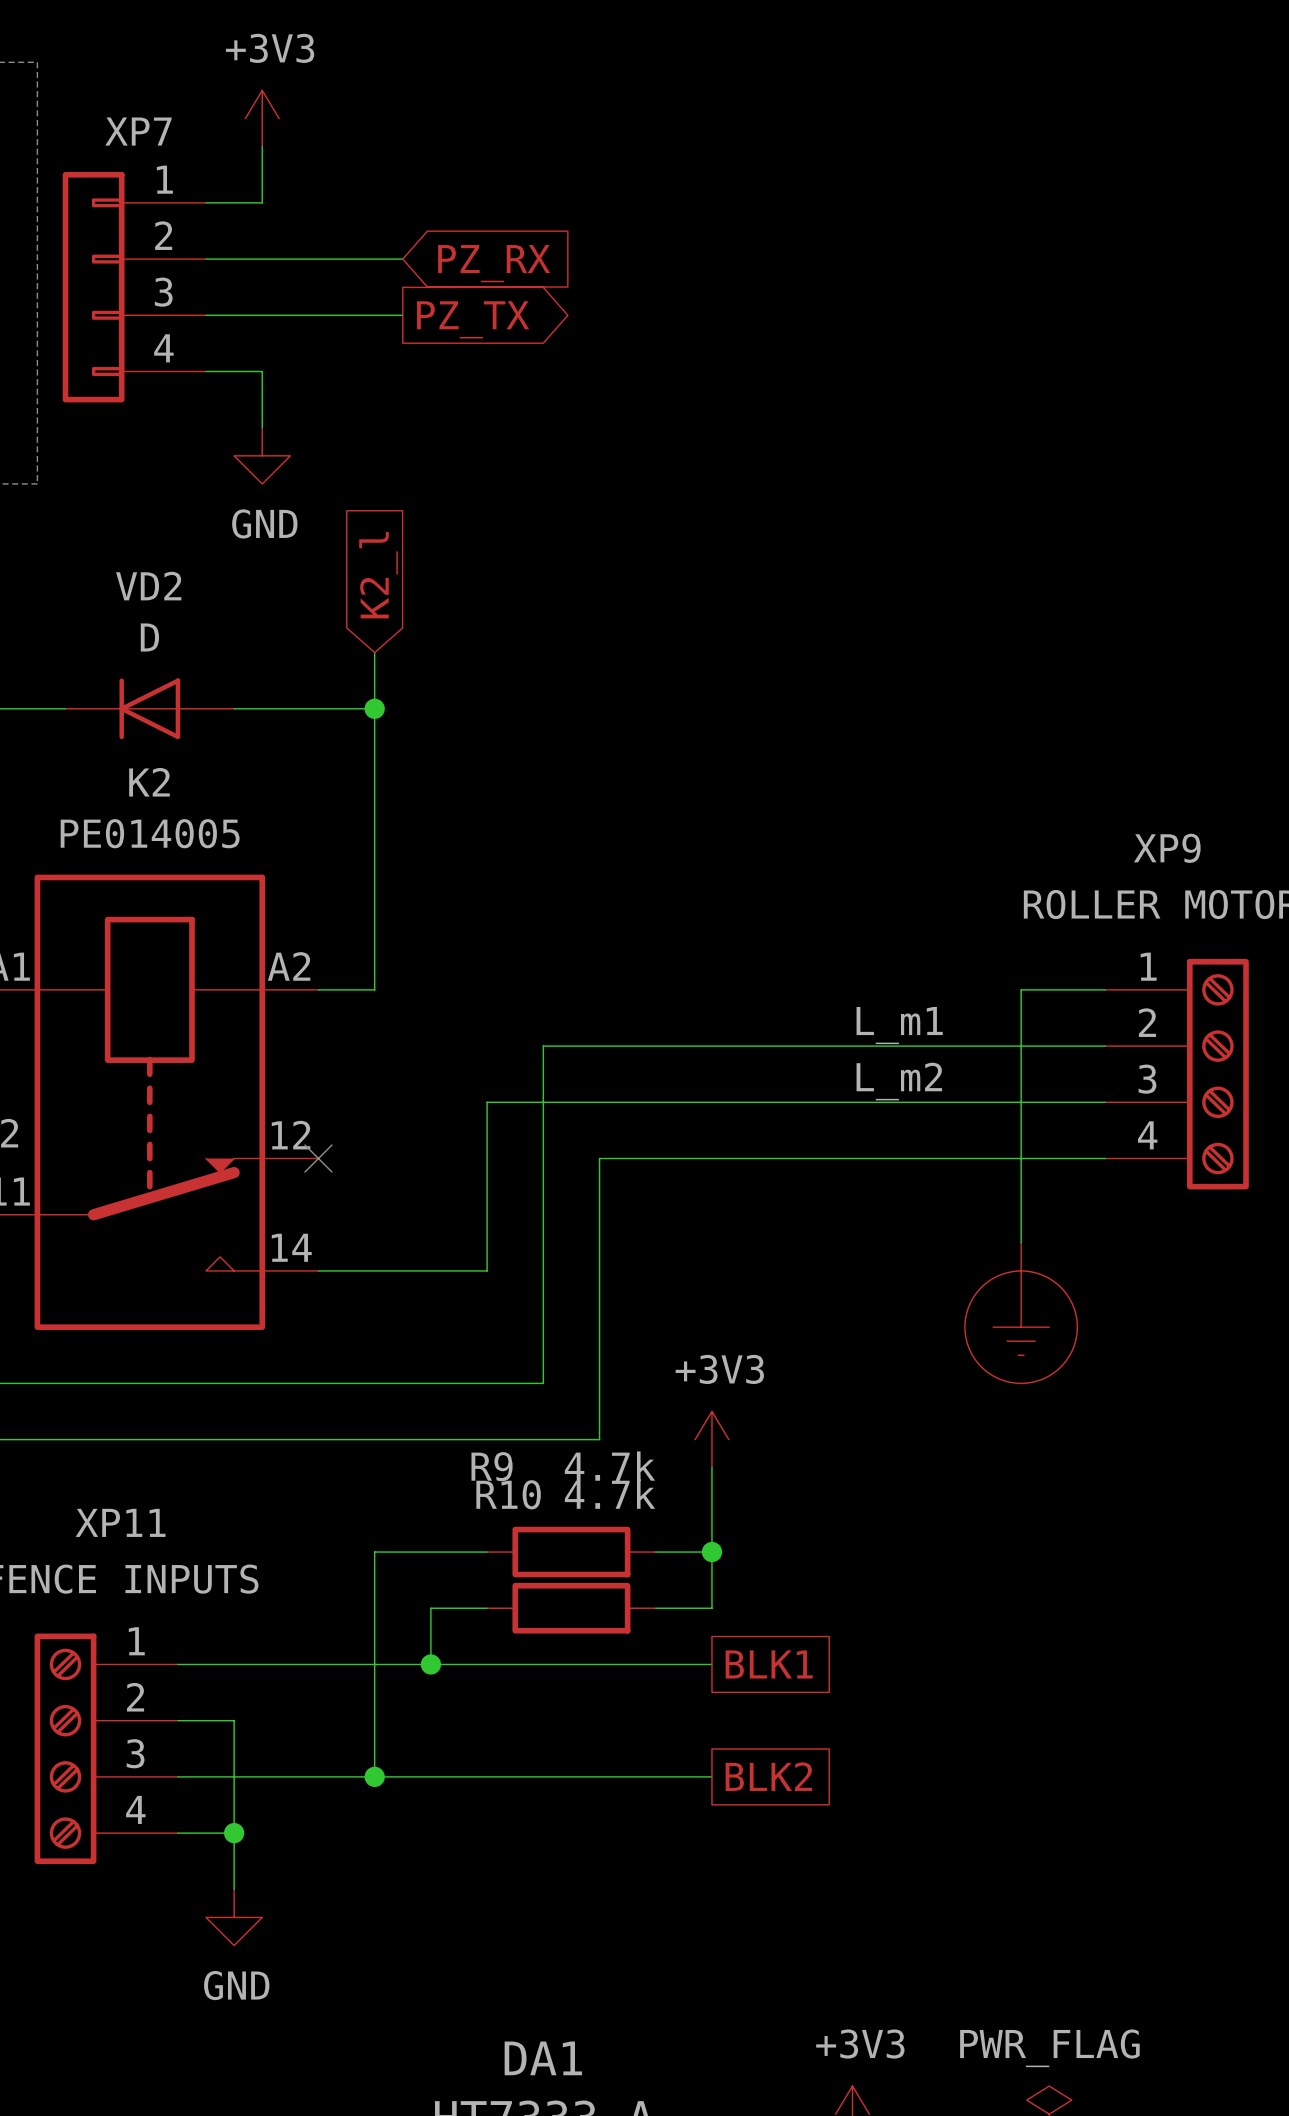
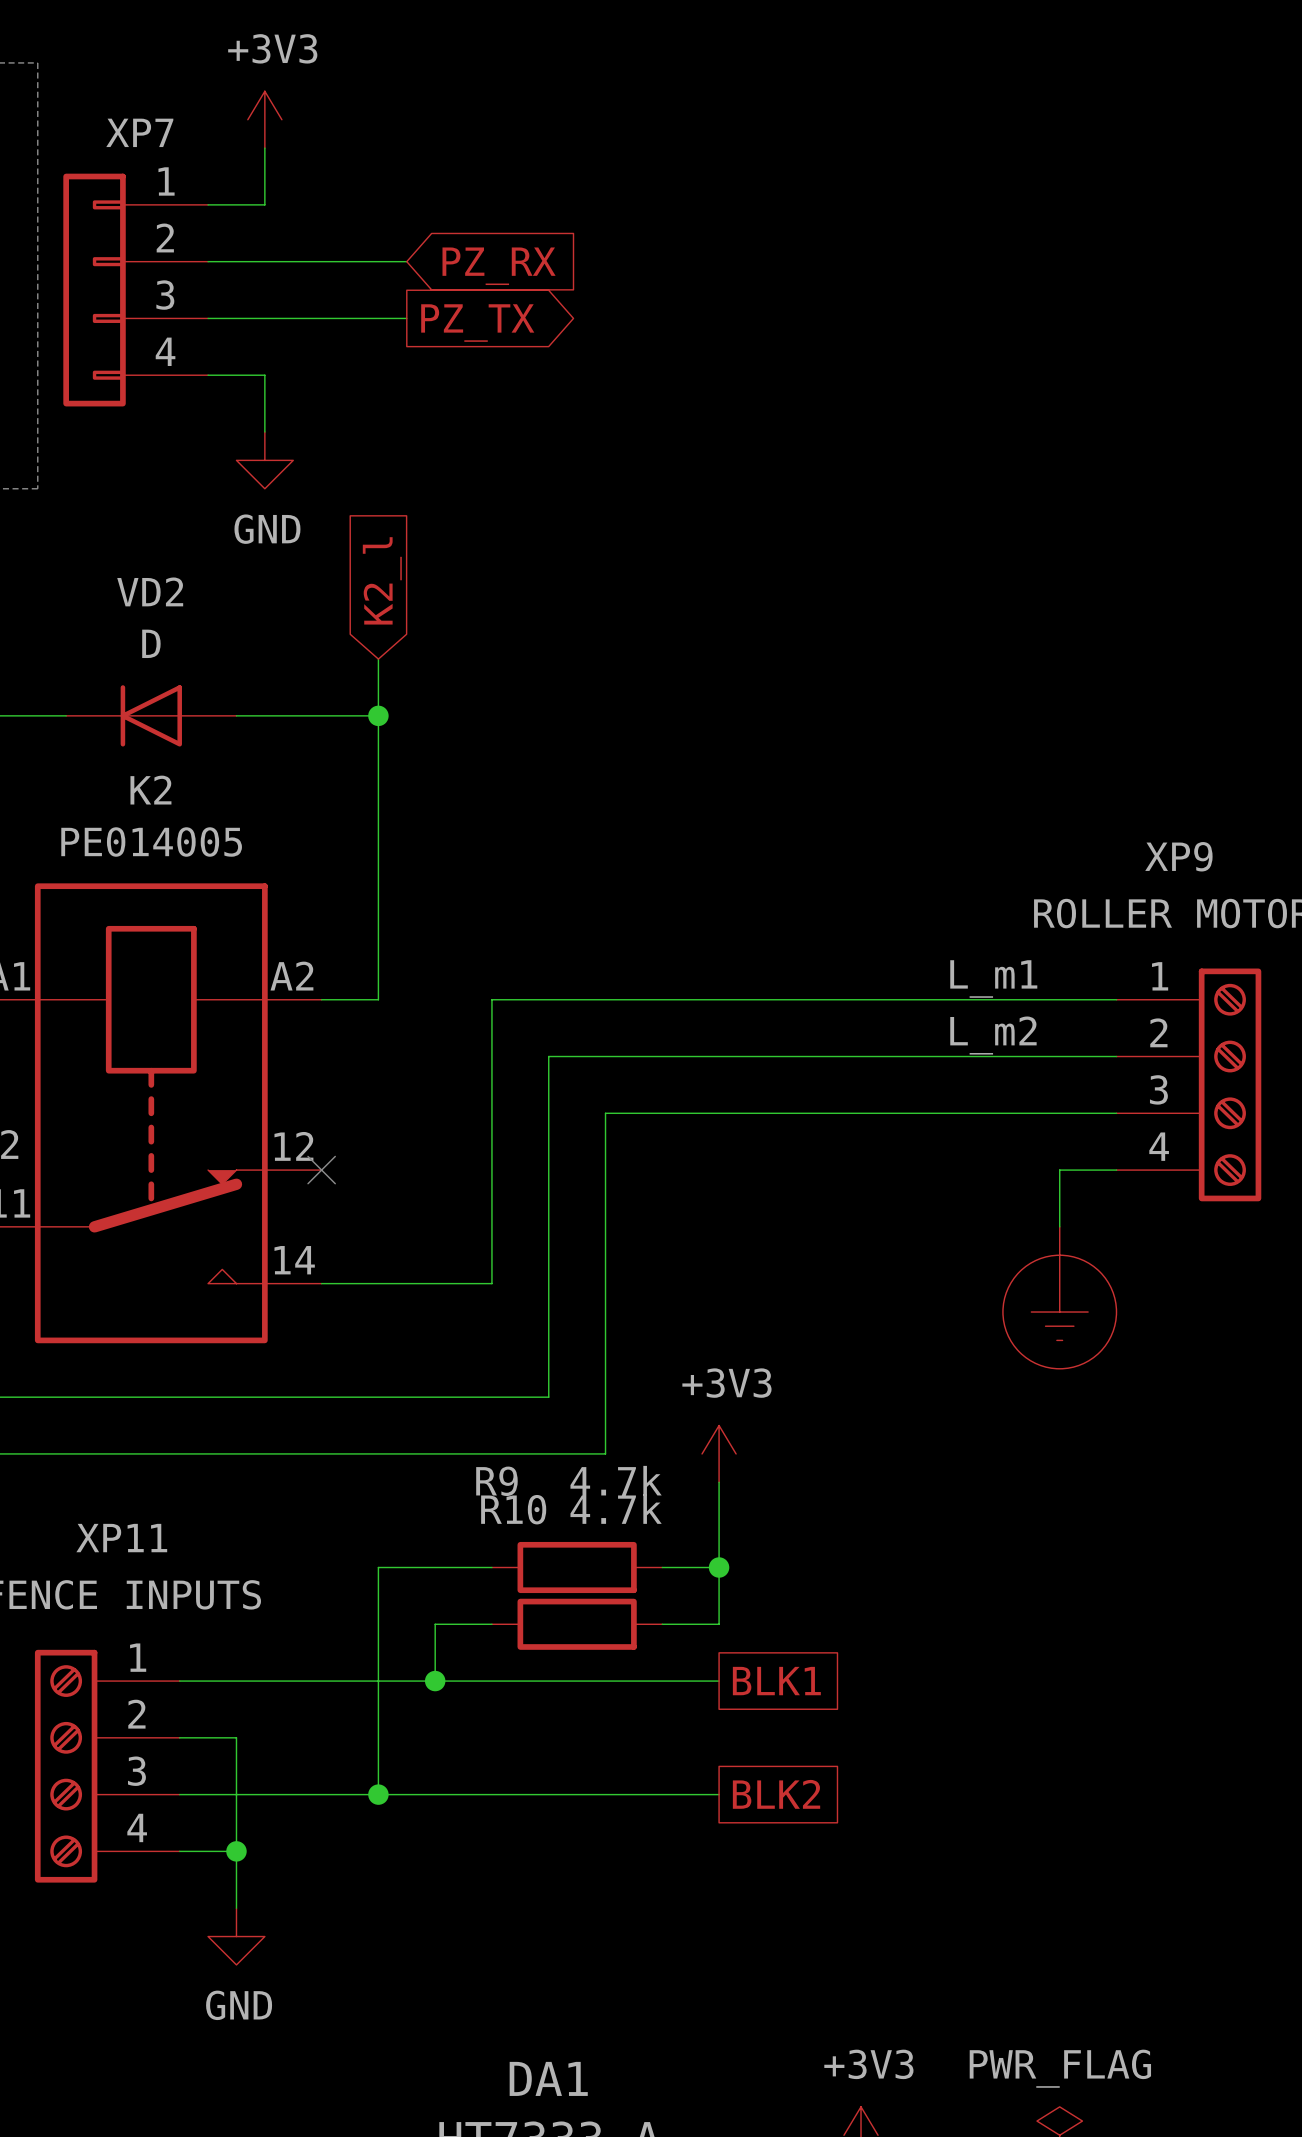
wire: (1021, 989) (1021, 1242) -> (1031, 999) (491, 999) (491, 1113)
label position: L_m1 (899, 1025) -> L_m1 (993, 979)
label position: L_m2 (899, 1081) -> L_m2 (993, 1035)
wire: (487, 1102) (599, 1102) -> (605, 1170) (605, 1113)
wire: (599, 1158) (1049, 1158) -> (1059, 1226) (1059, 1170)
power symbol position: (1021, 1313) -> (1059, 1297)

